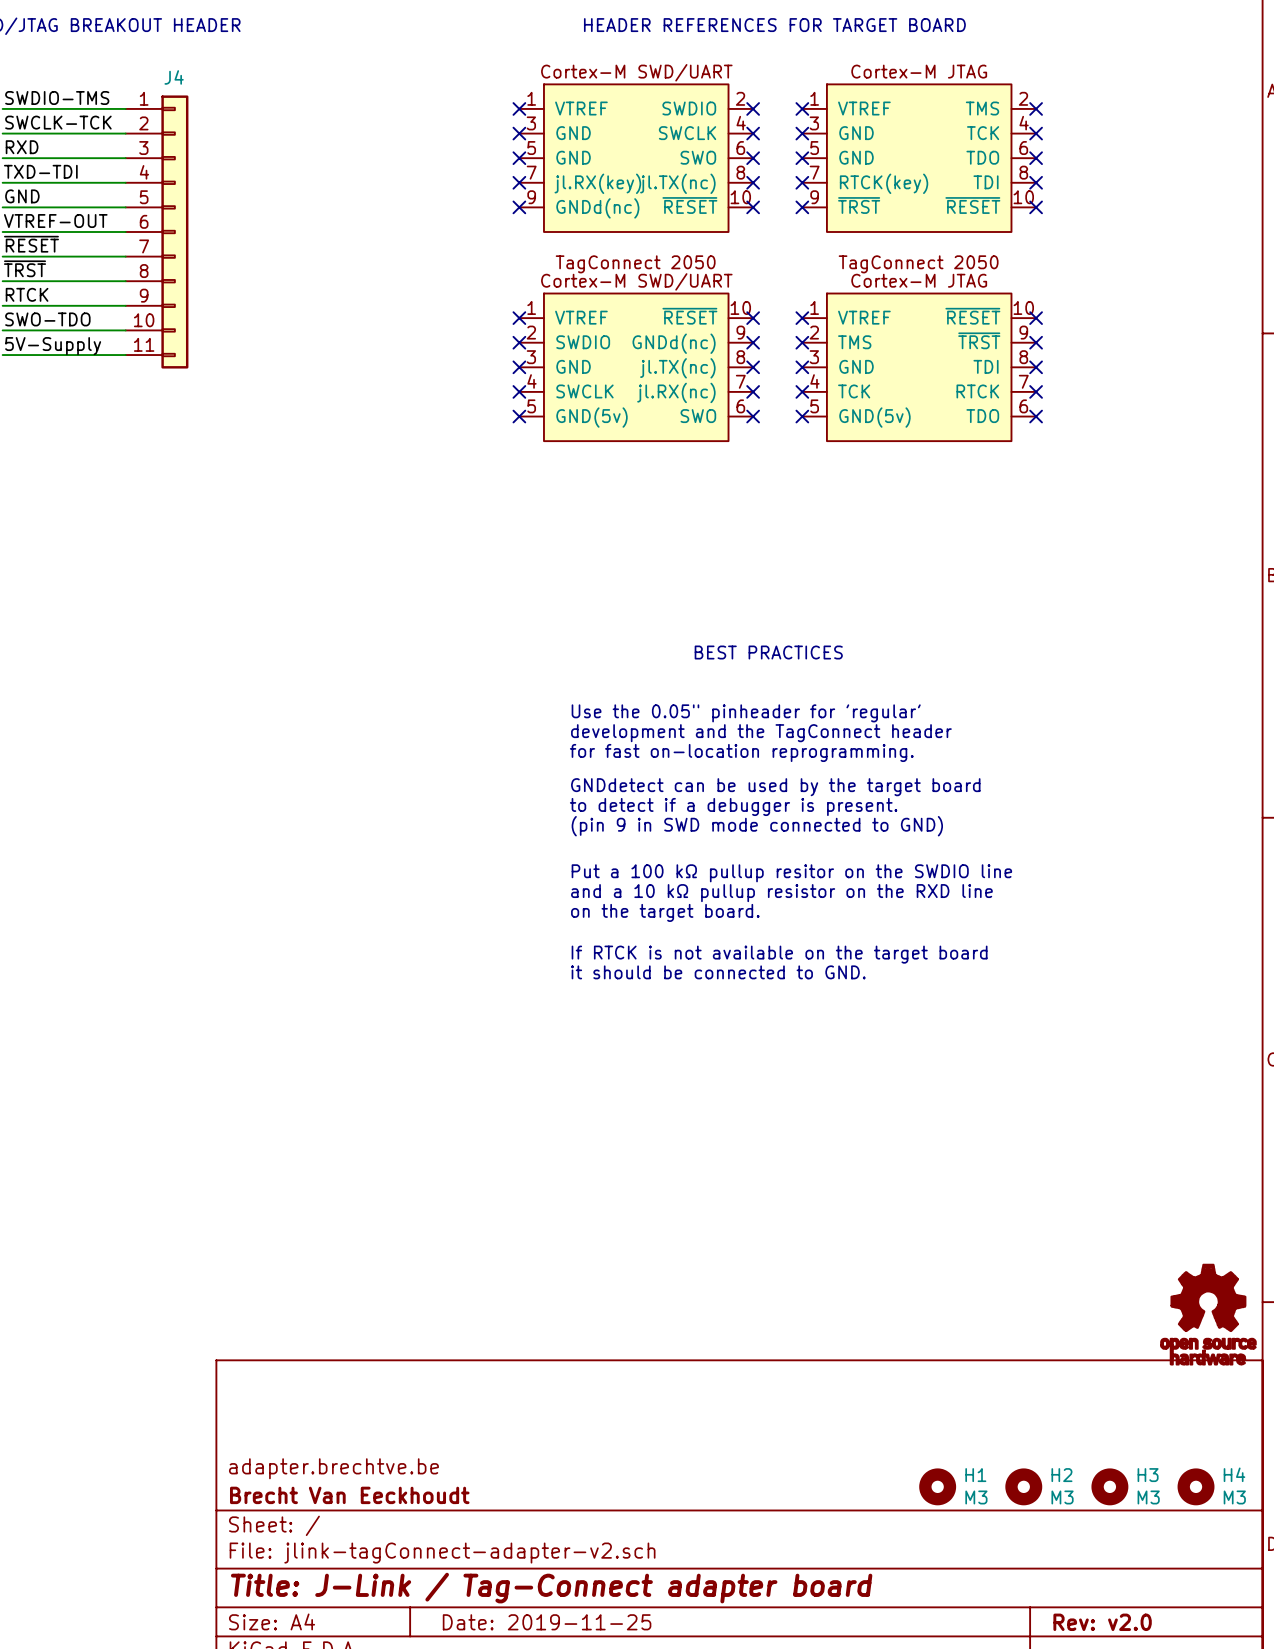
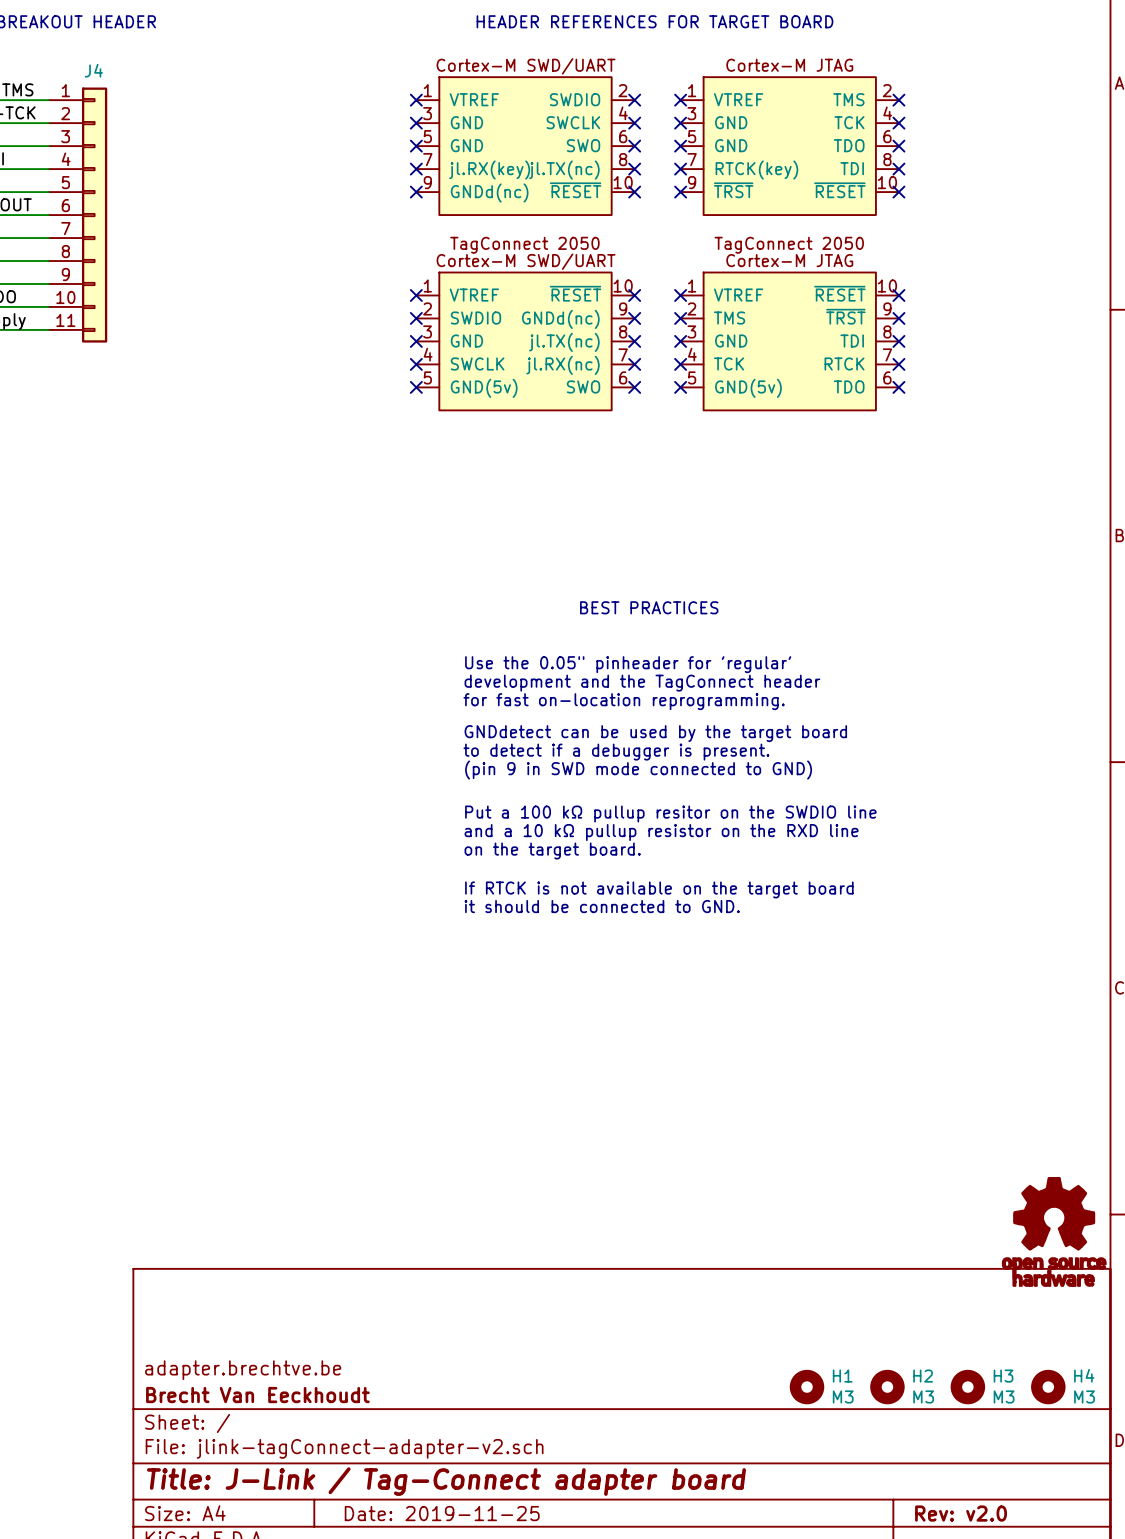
part symbol: [1160, 1264, 1256, 1365] -> [1002, 1177, 1106, 1287]

